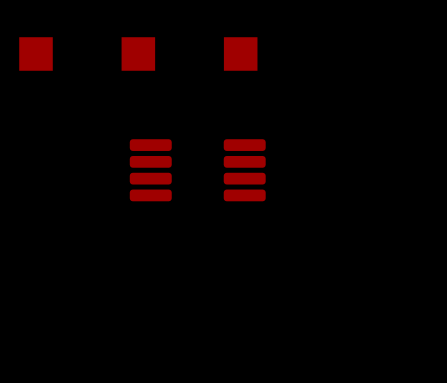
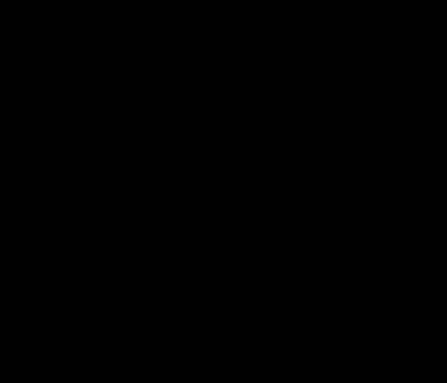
part: (36, 53) -> none
part: (138, 53) -> none
part: (240, 53) -> none
part: (197, 170) -> none

